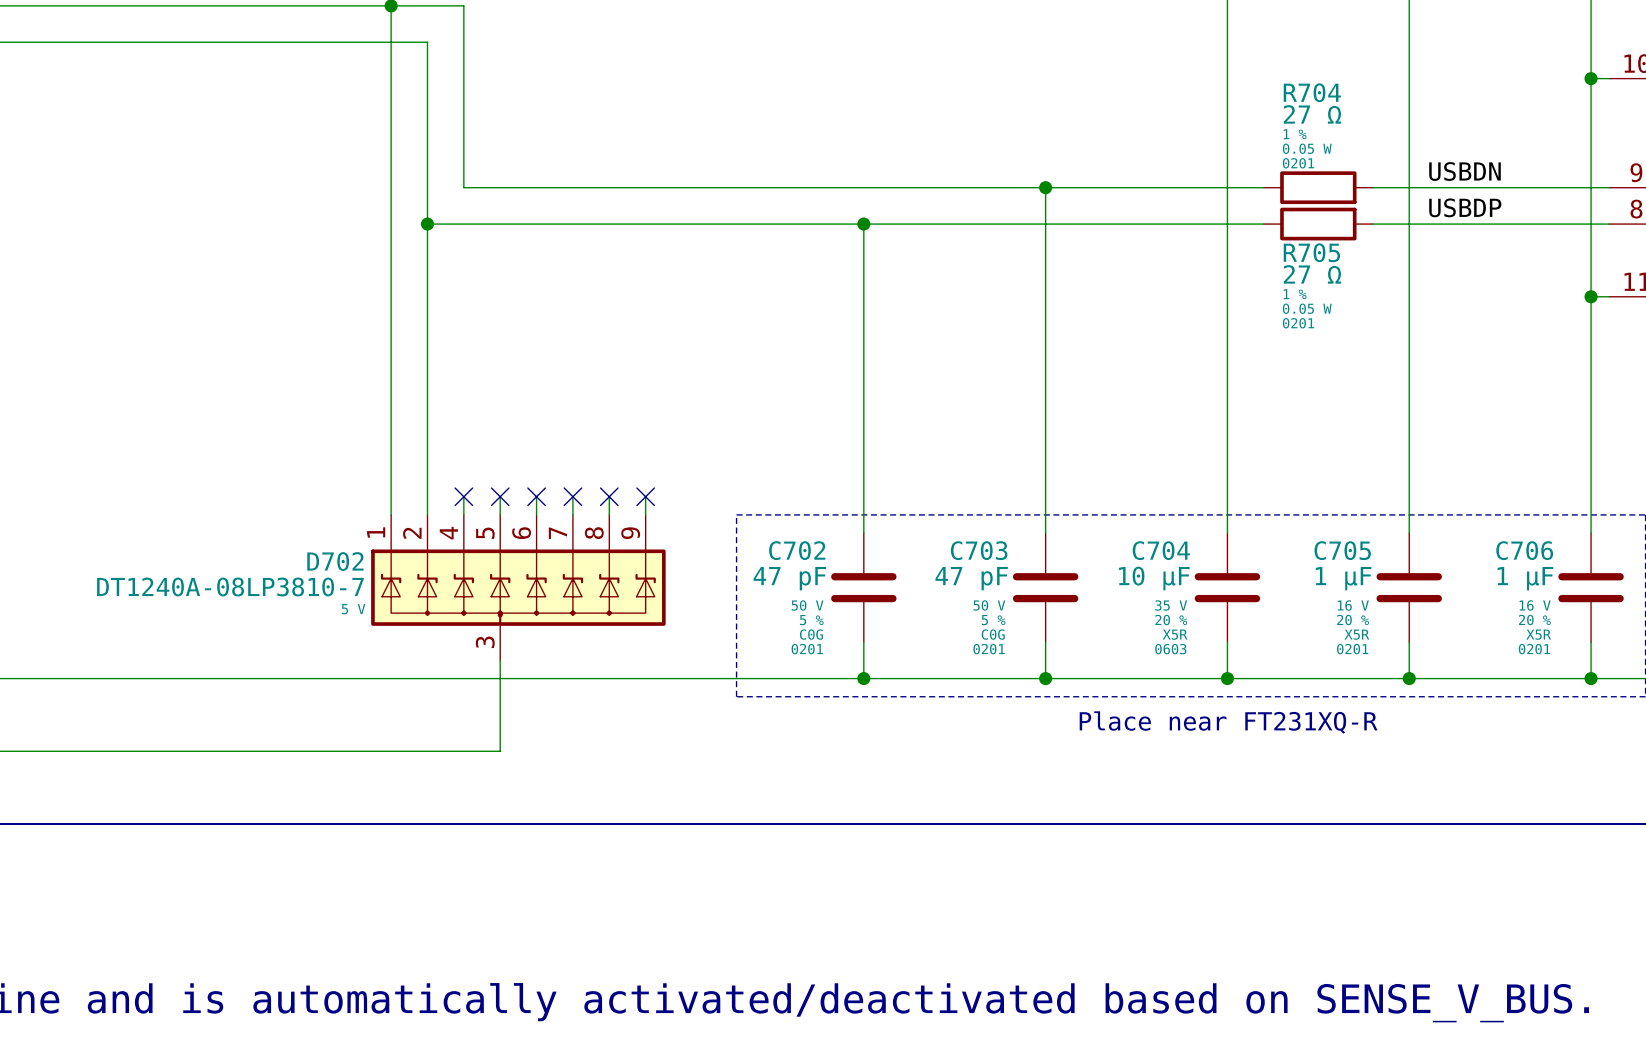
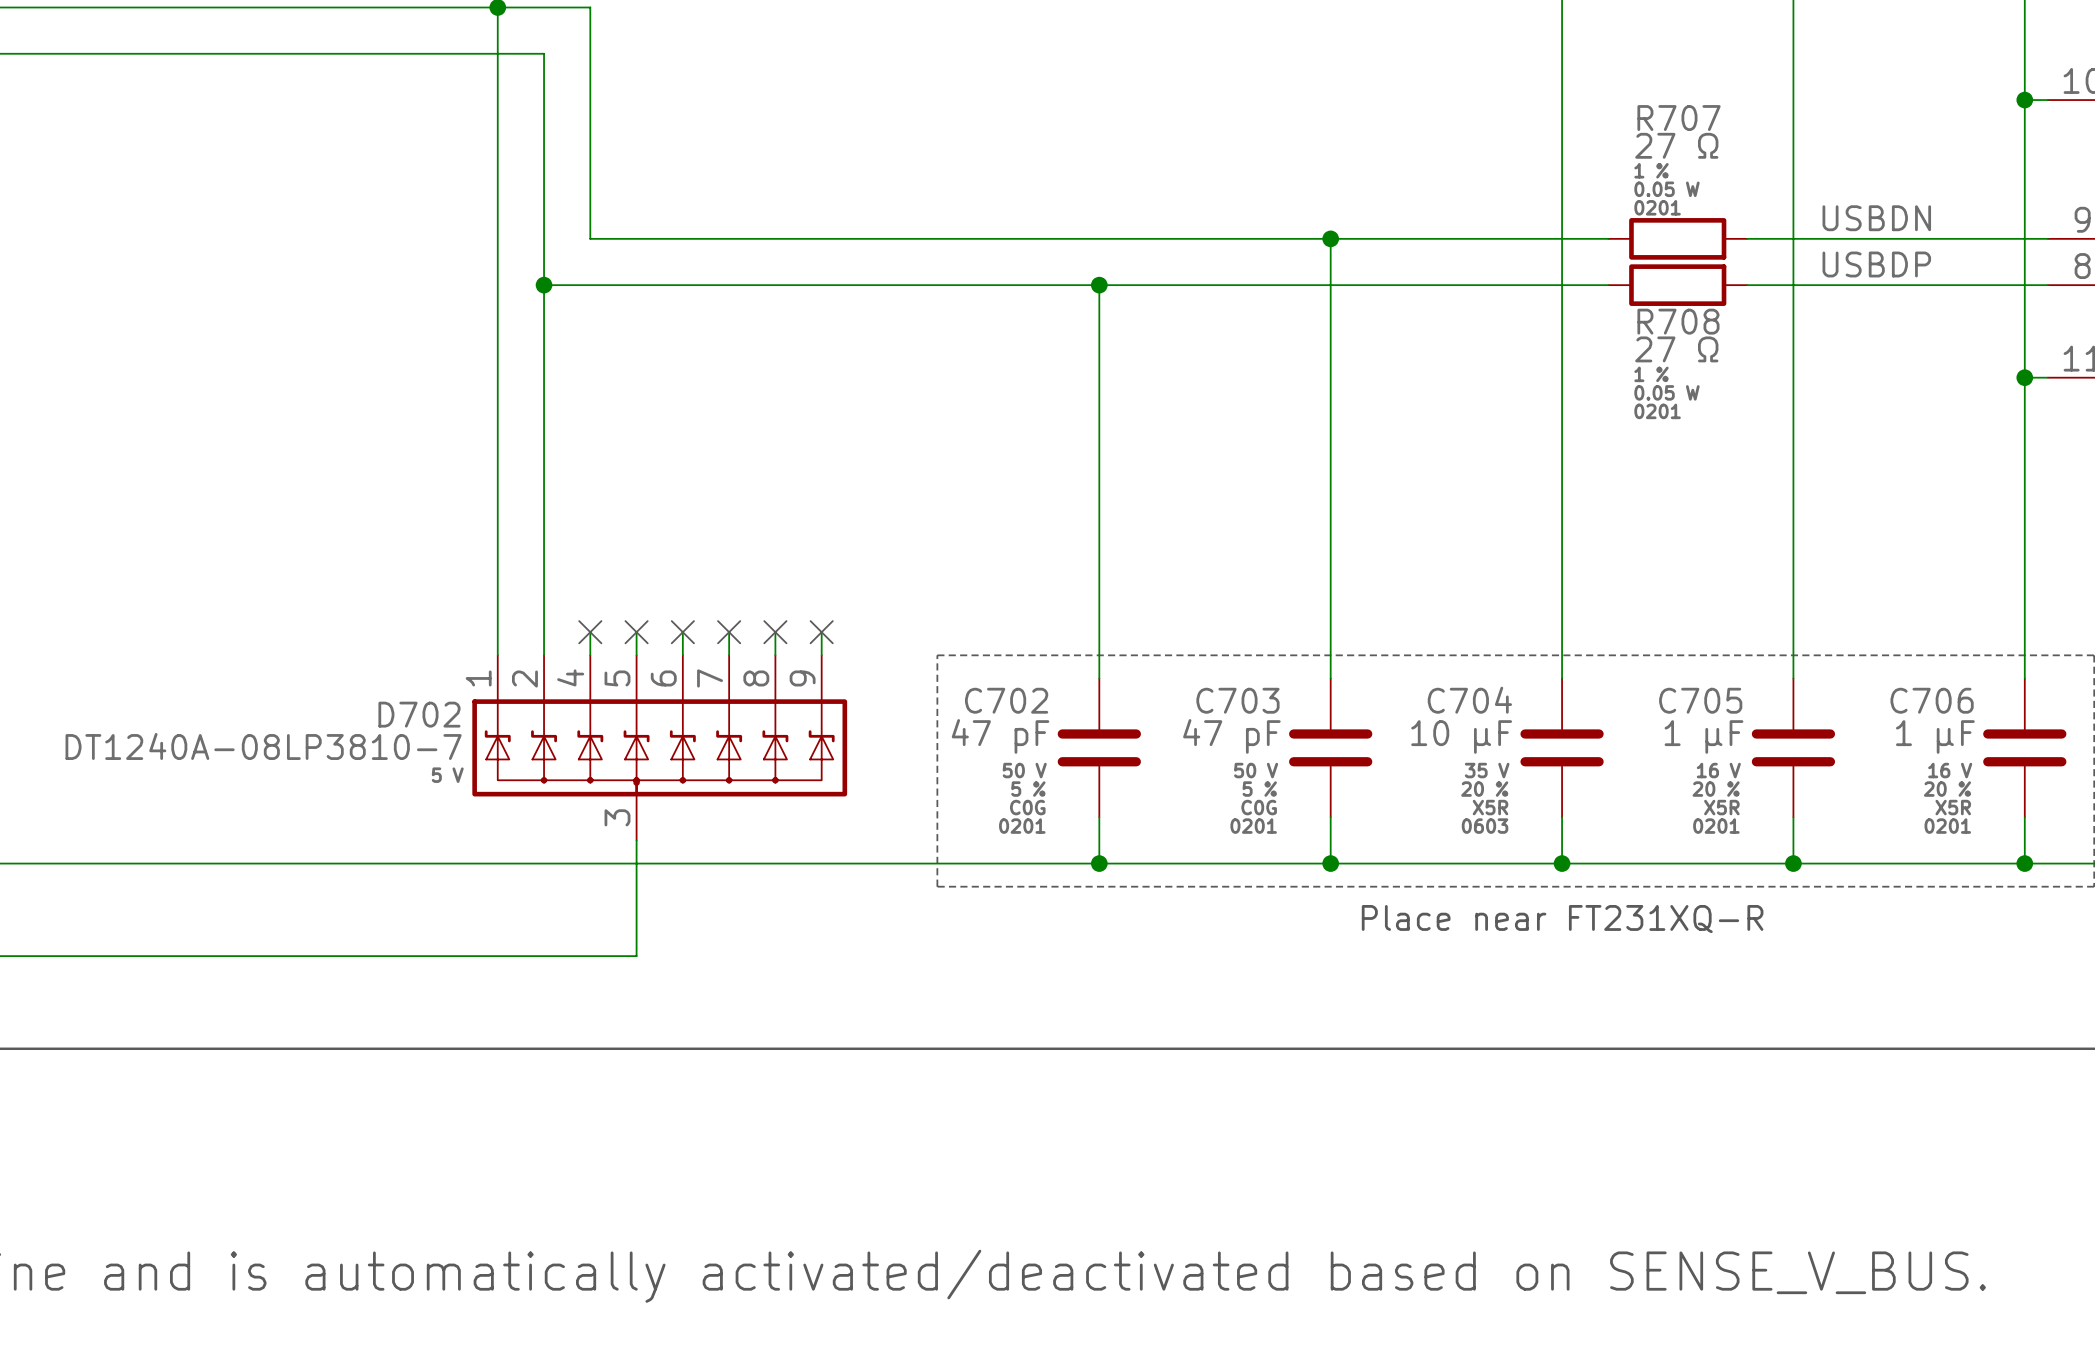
R704 name: R704 (1312, 92) -> R707 (1679, 118)
R705 name: R705 (1311, 252) -> R708 (1678, 321)

